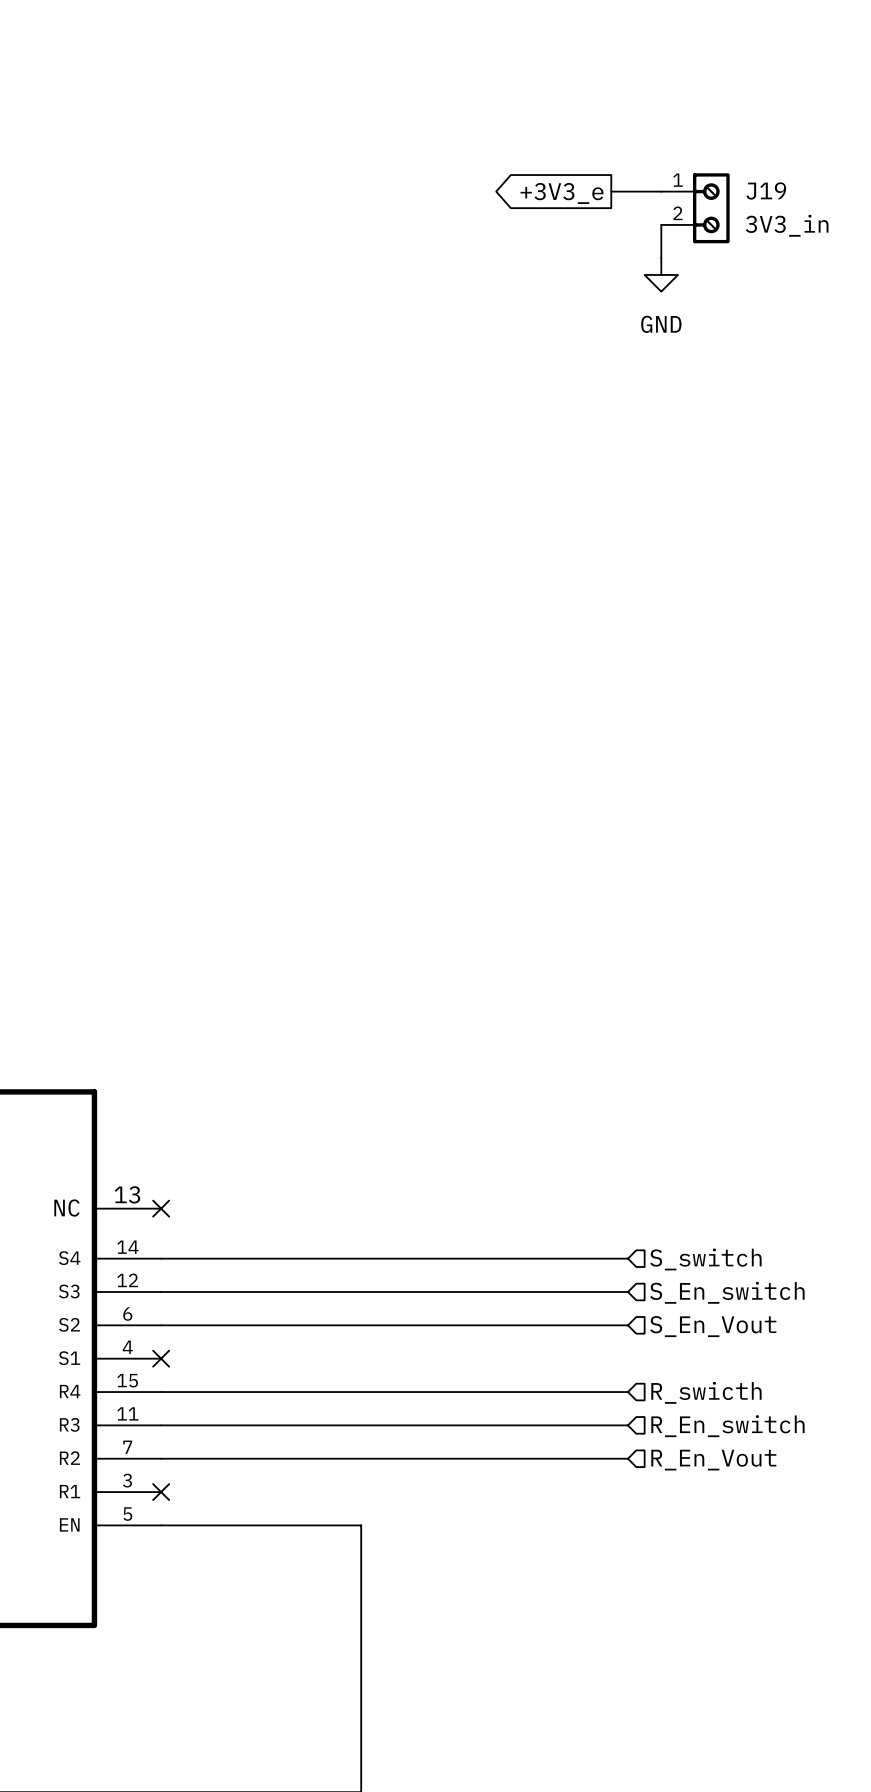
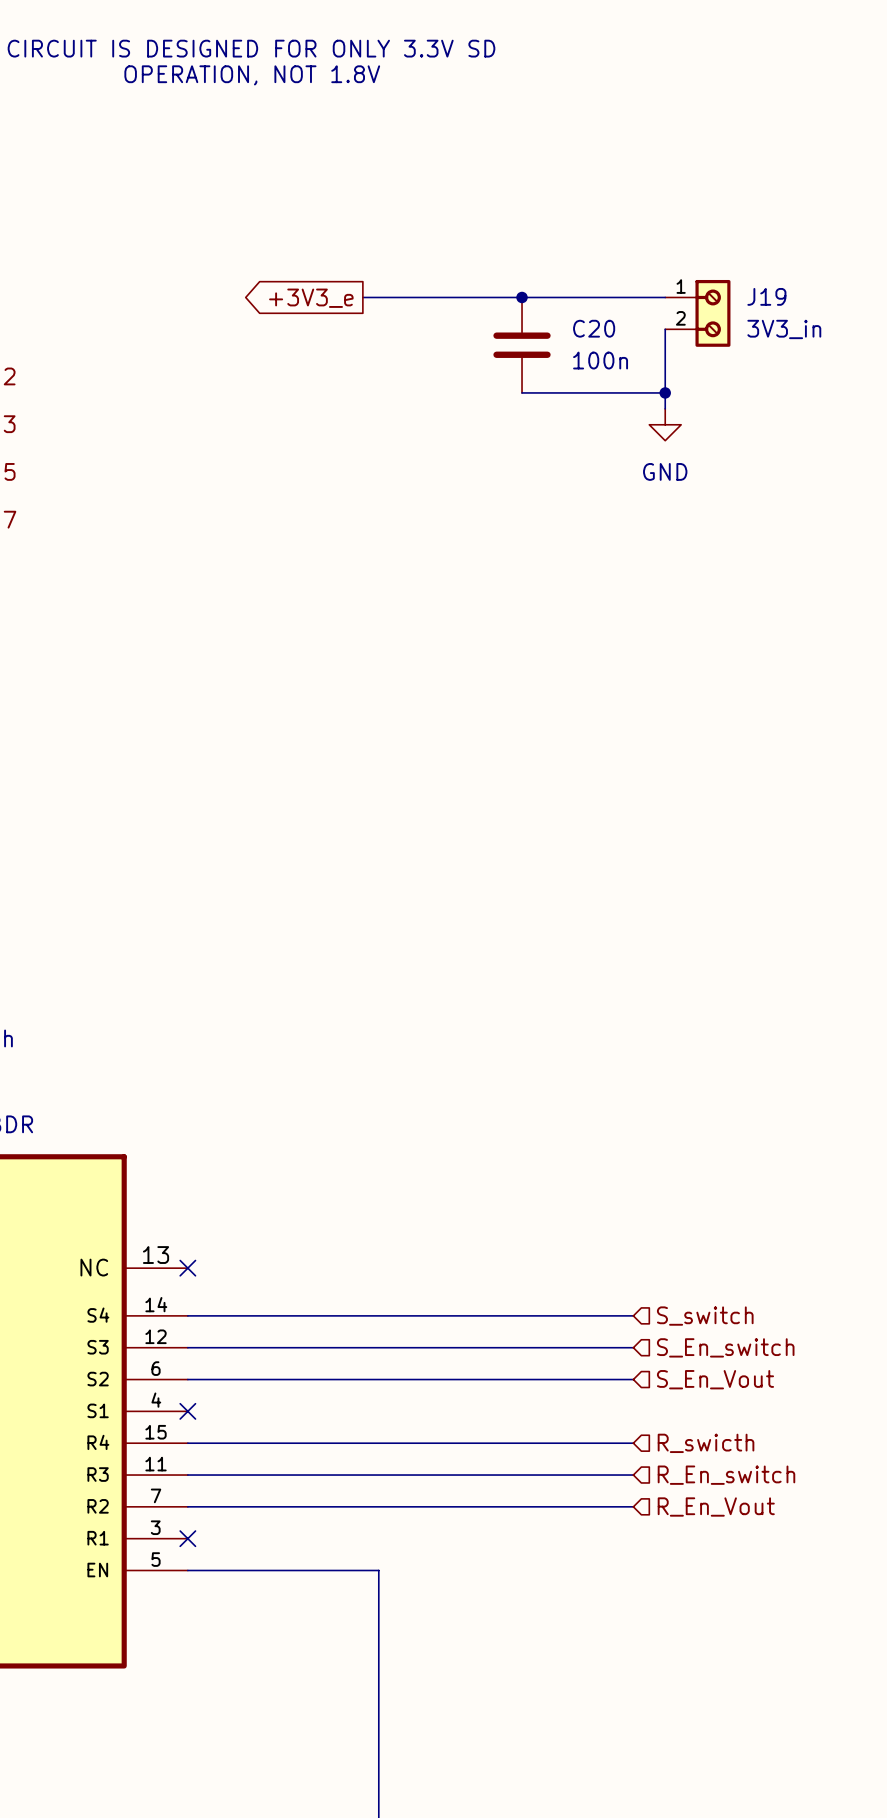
wire: none -> (362, 297) (617, 297)
junction: none -> (522, 297)
global label position: +3V3_e (561, 193) -> +3V3_e (311, 298)
C20: none -> 100n (522, 345)
wire: none -> (665, 361) (665, 408)
power symbol position: GND (661, 274) -> GND (665, 424)
wire: none -> (522, 392) (665, 392)
junction: none -> (665, 392)

